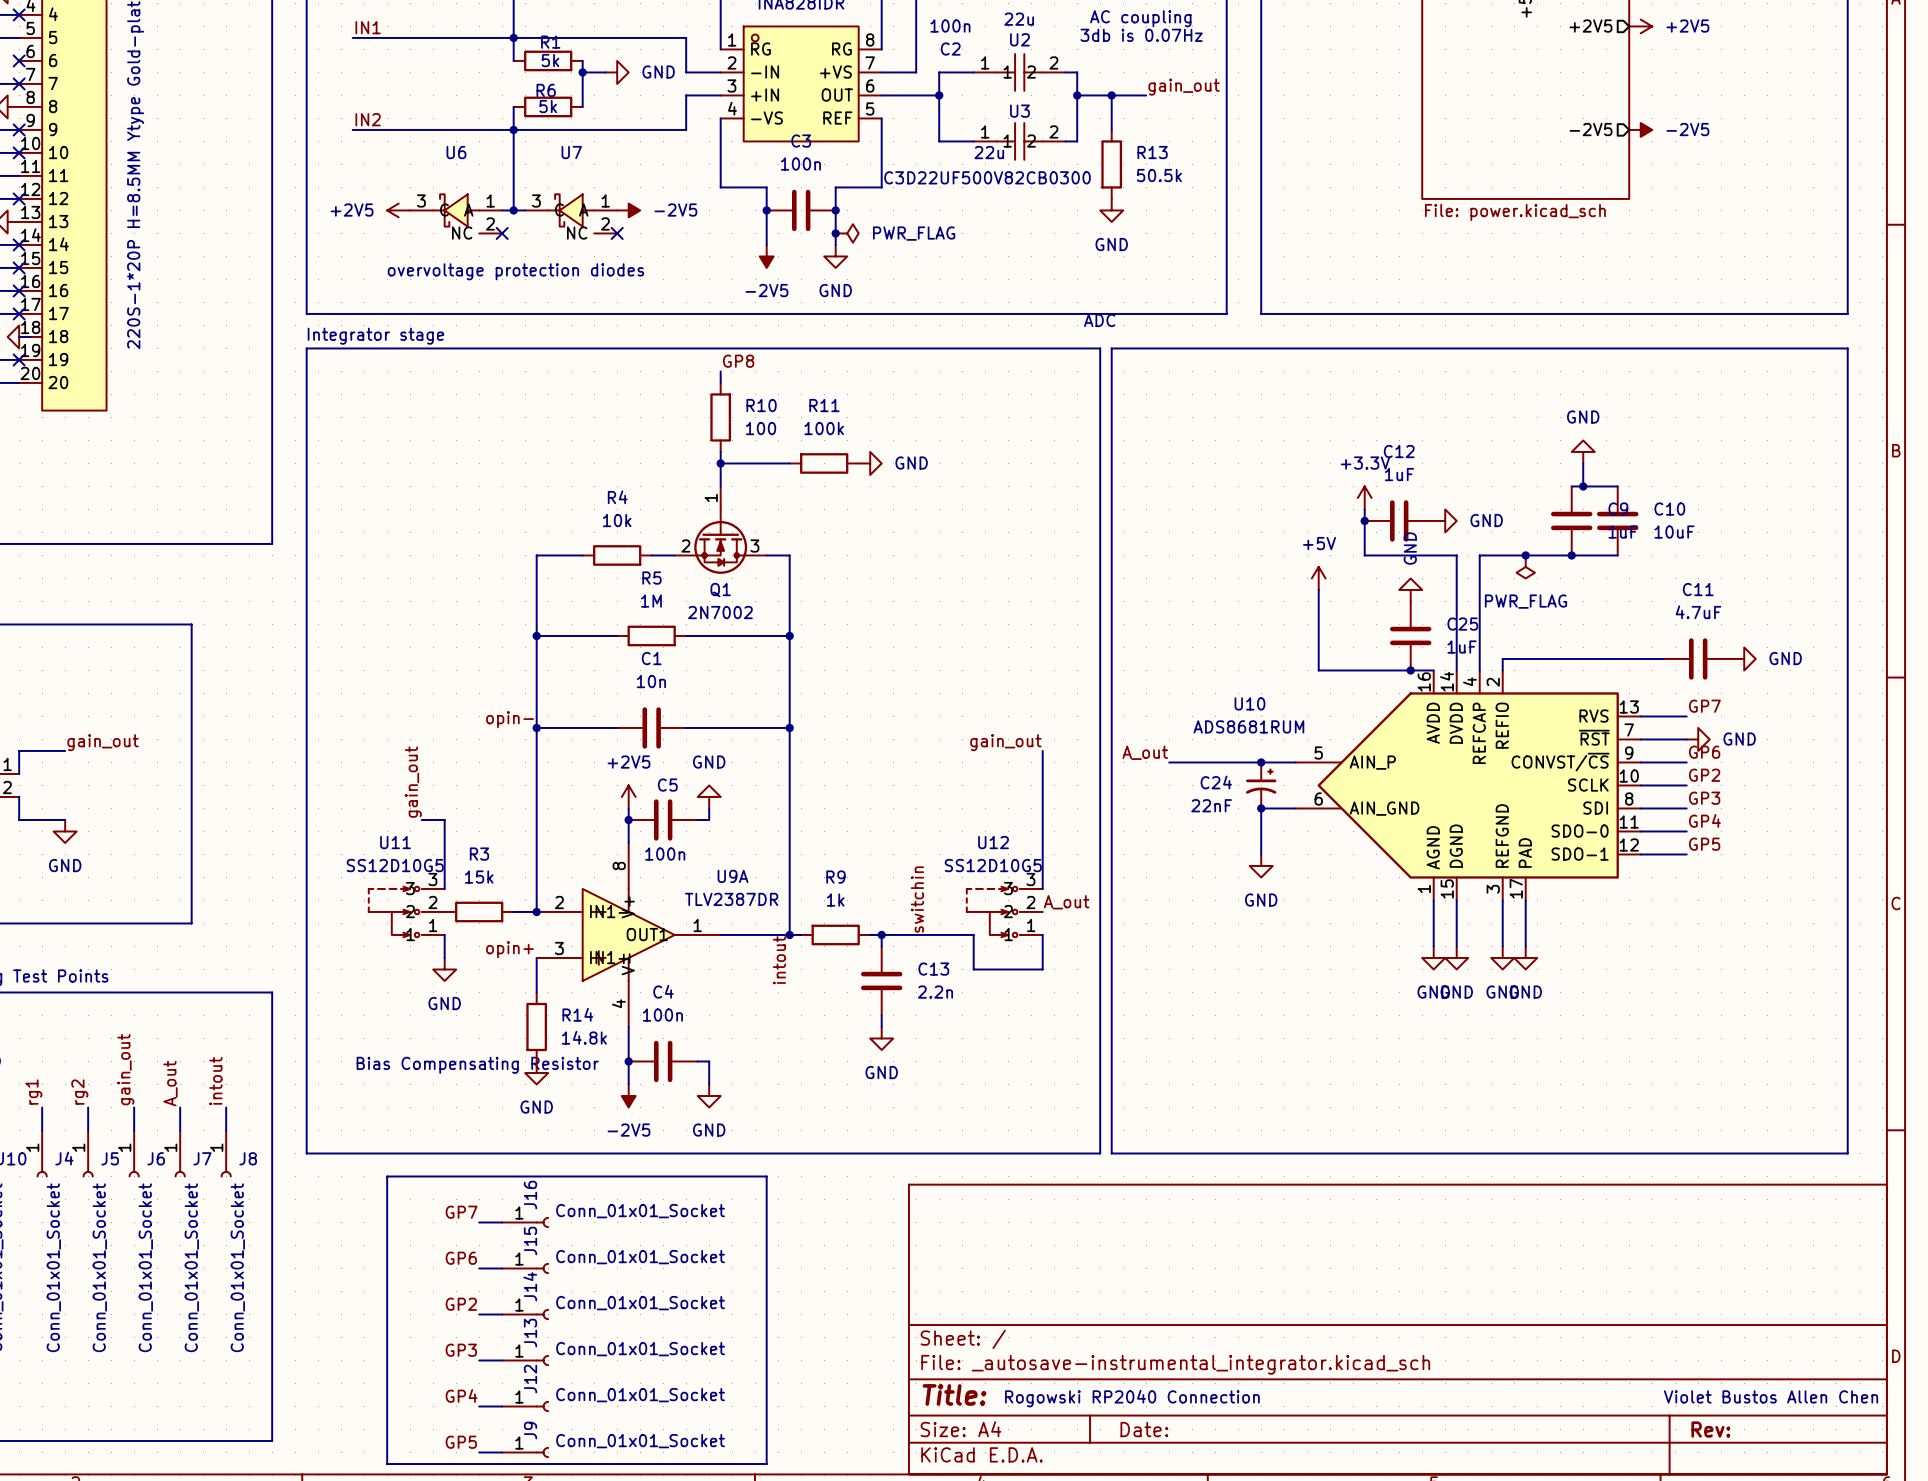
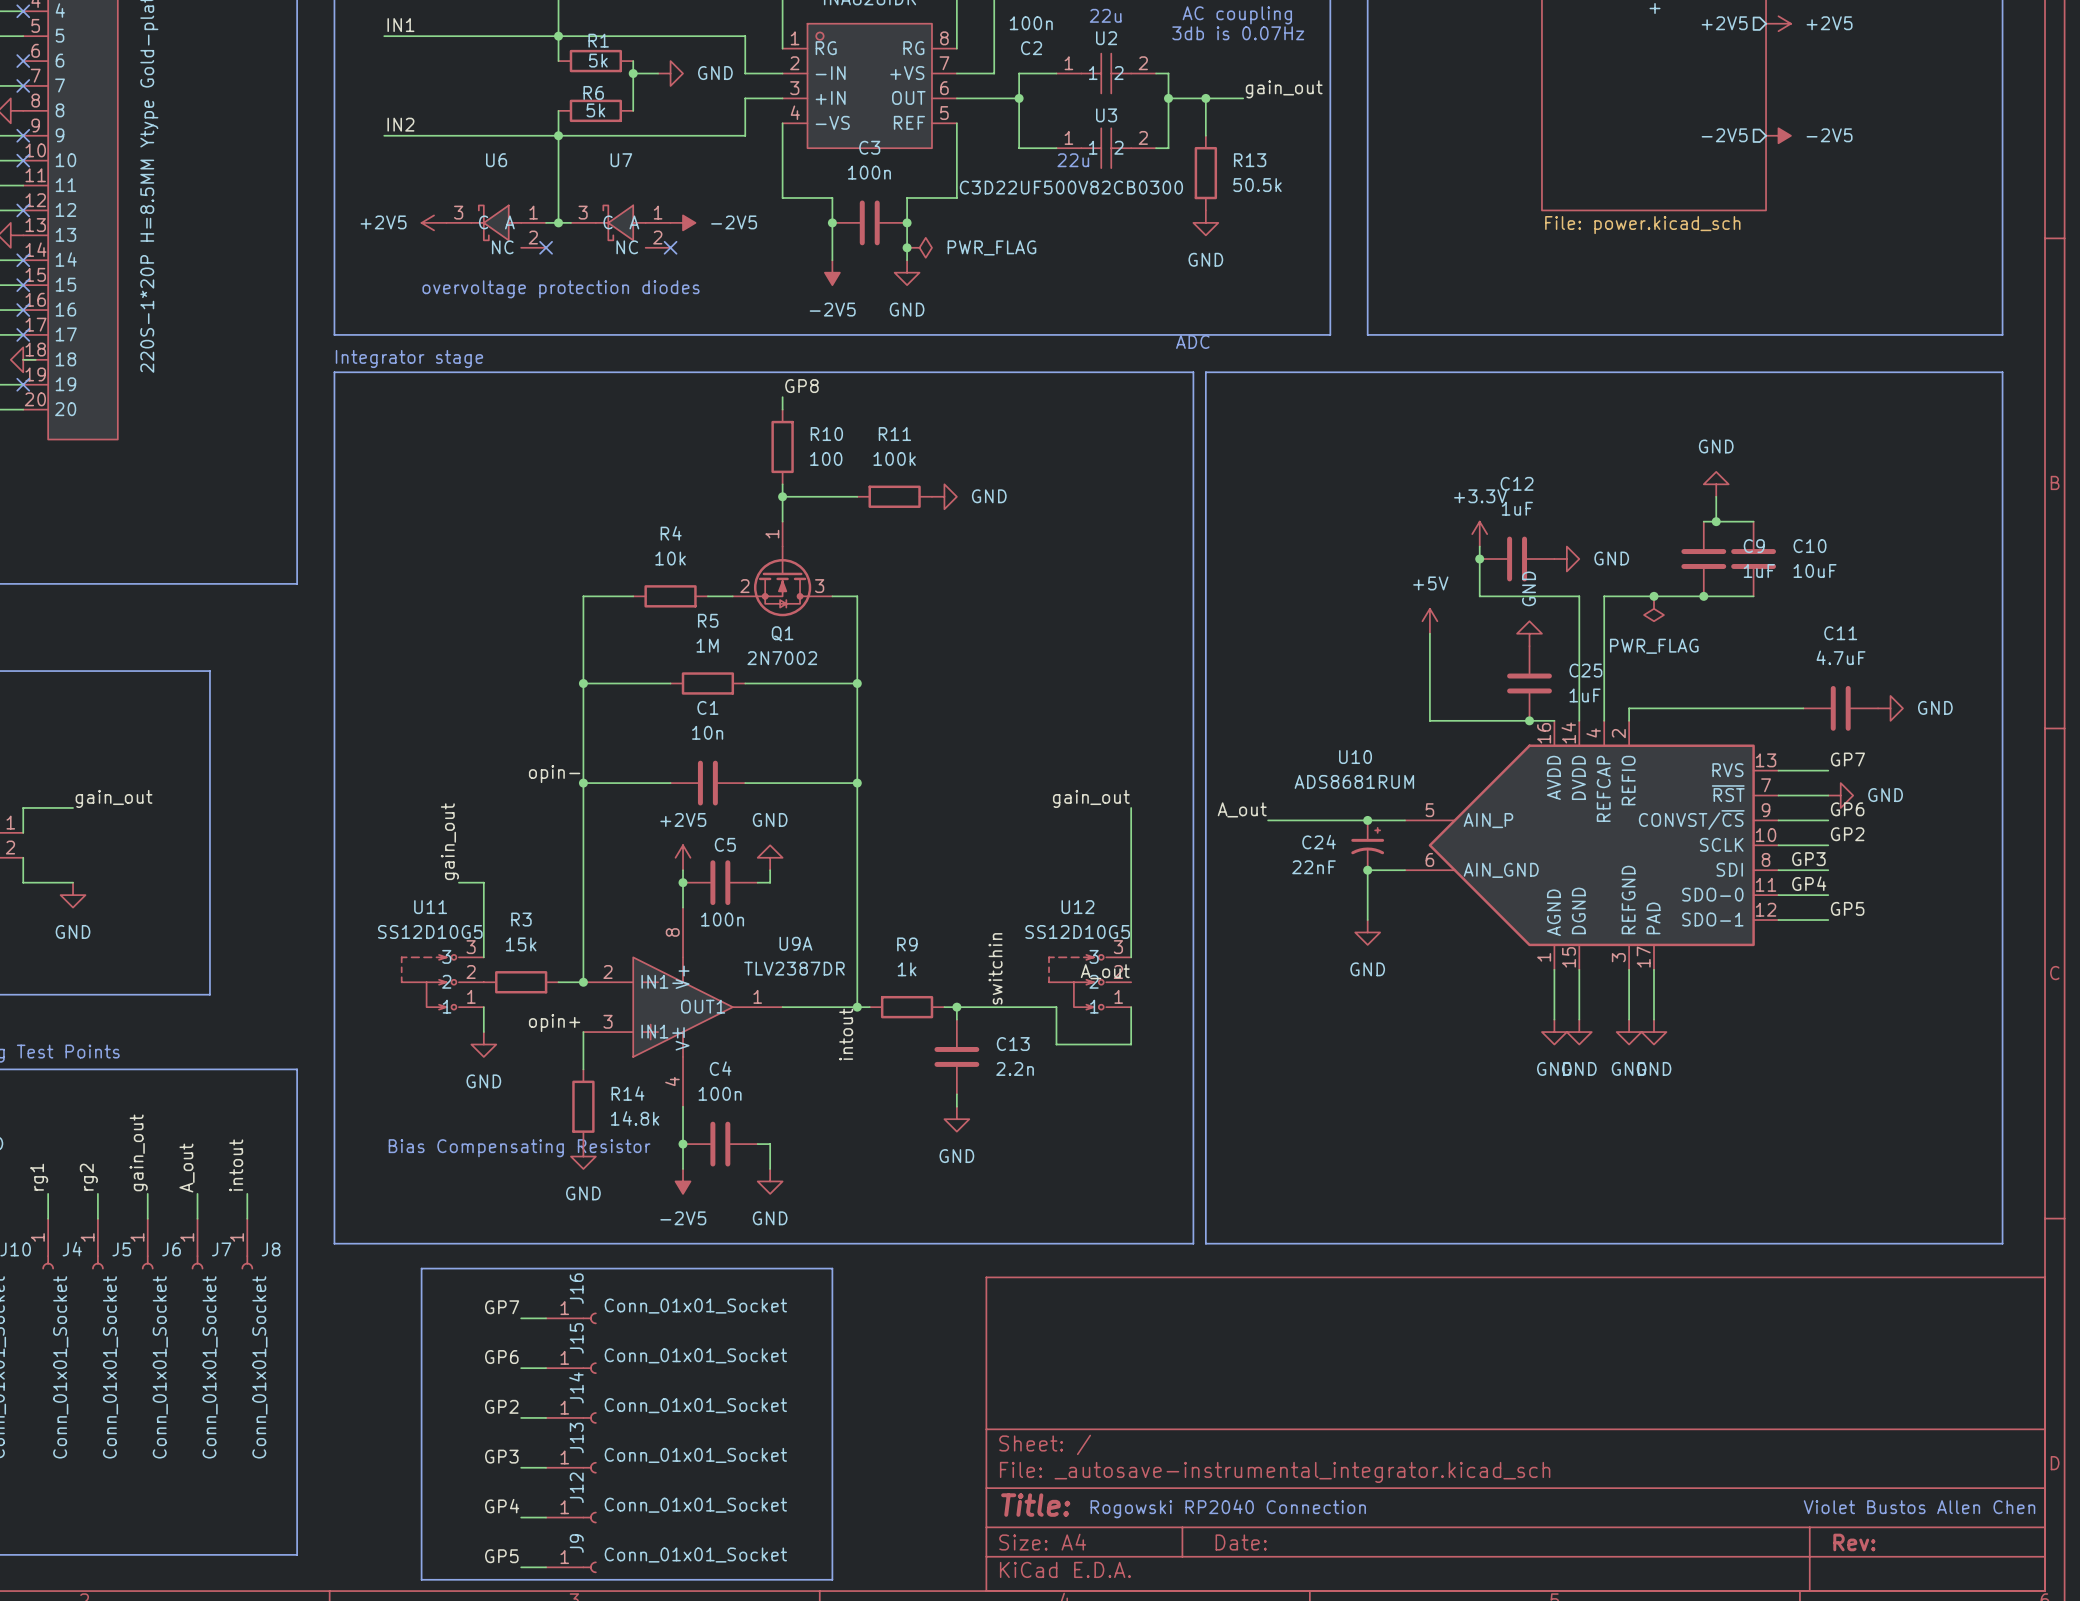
label position: GP3 (1704, 798) -> GP3 (1808, 859)
label position: GP4 (1704, 820) -> GP4 (1809, 883)
label position: A_out (1066, 902) -> A_out (1105, 971)

